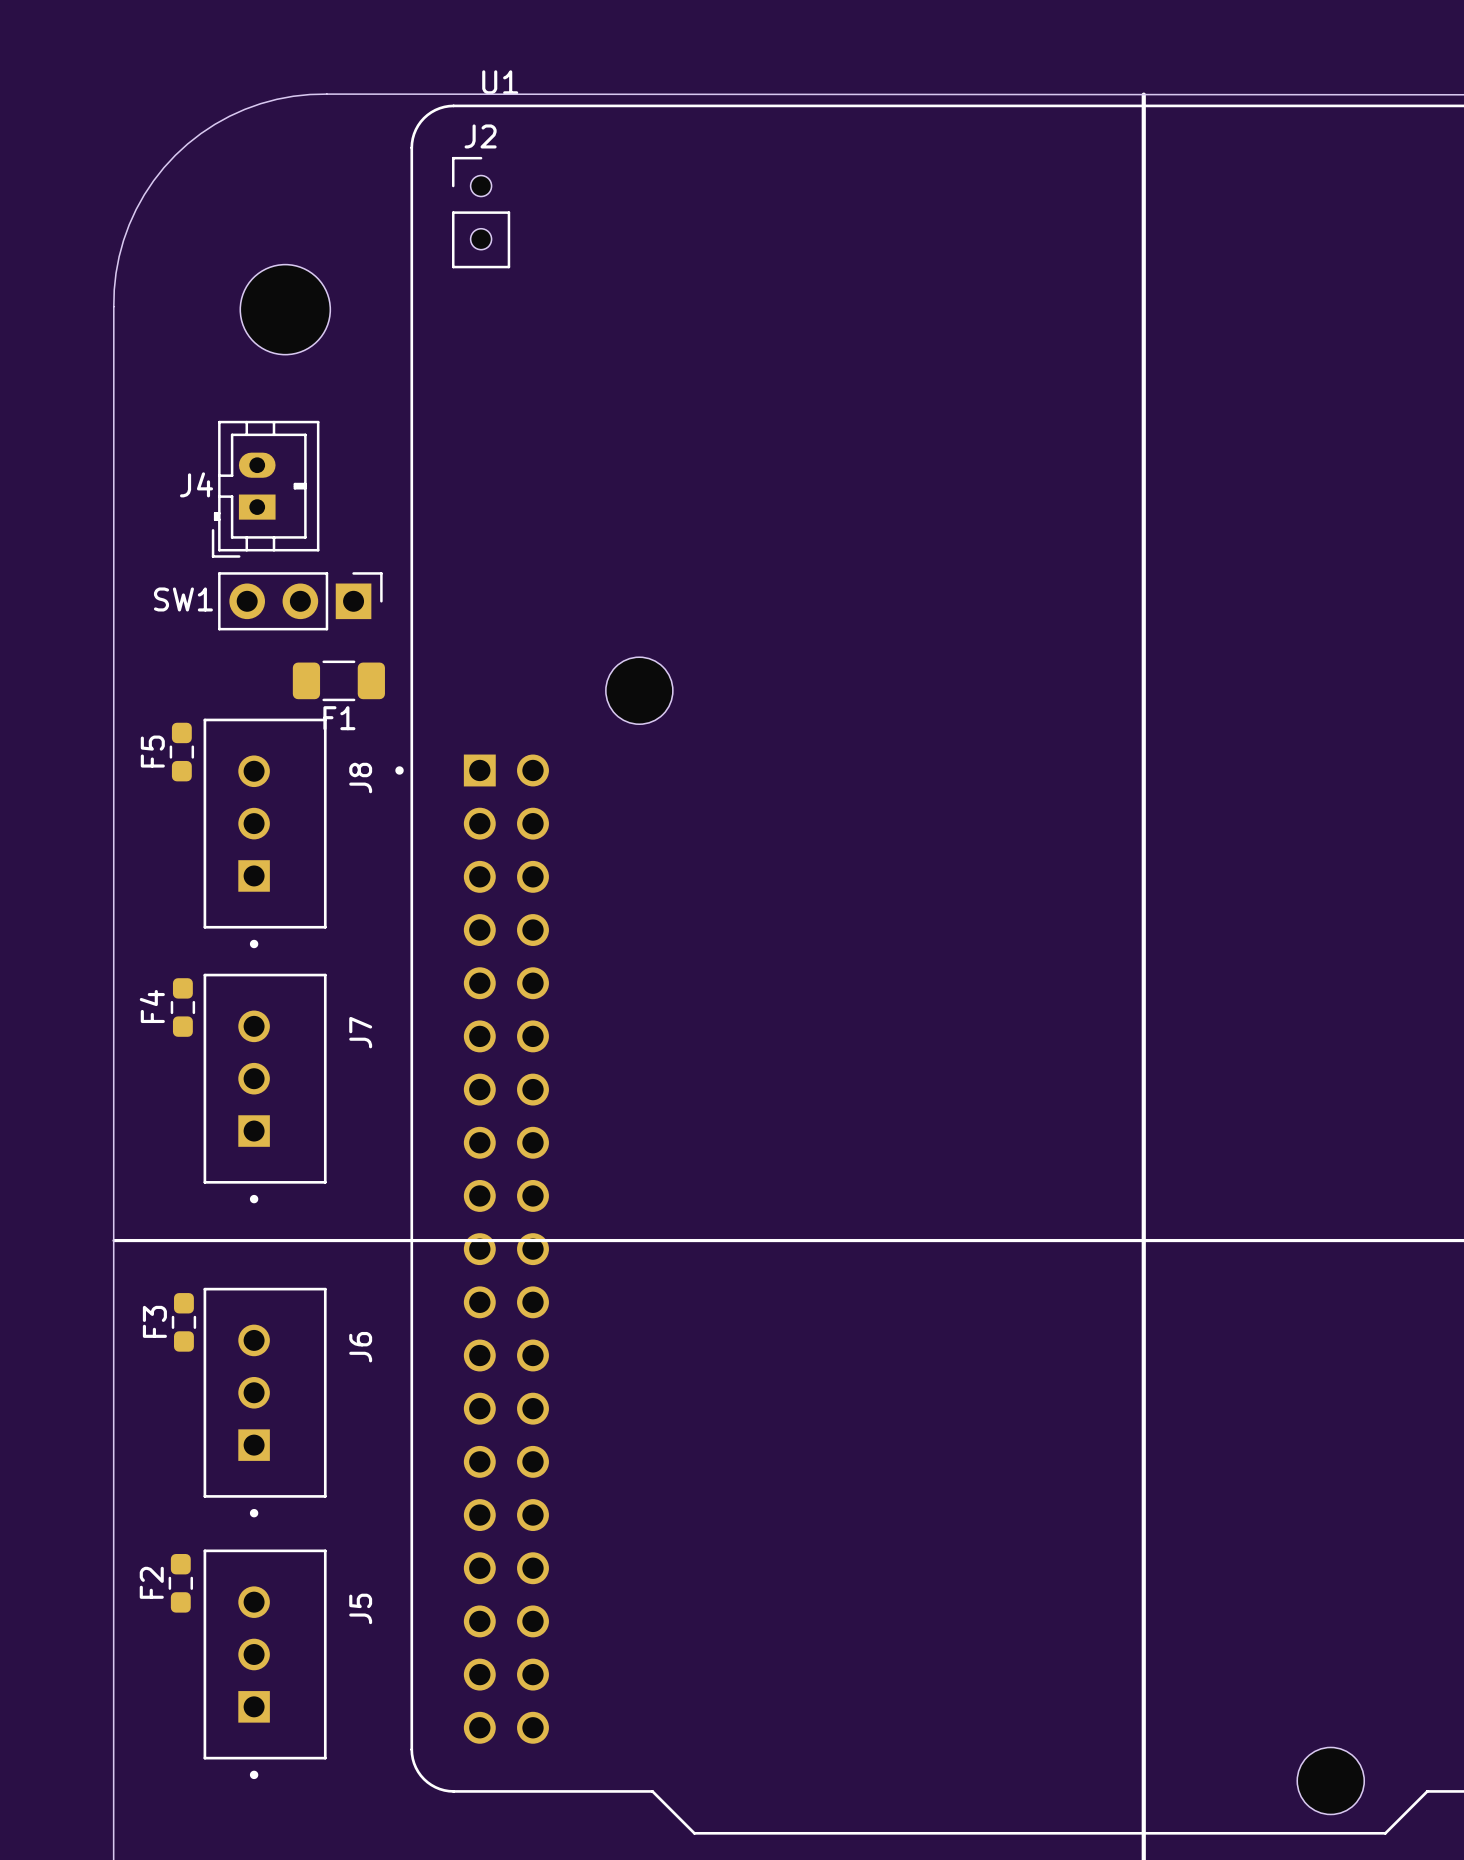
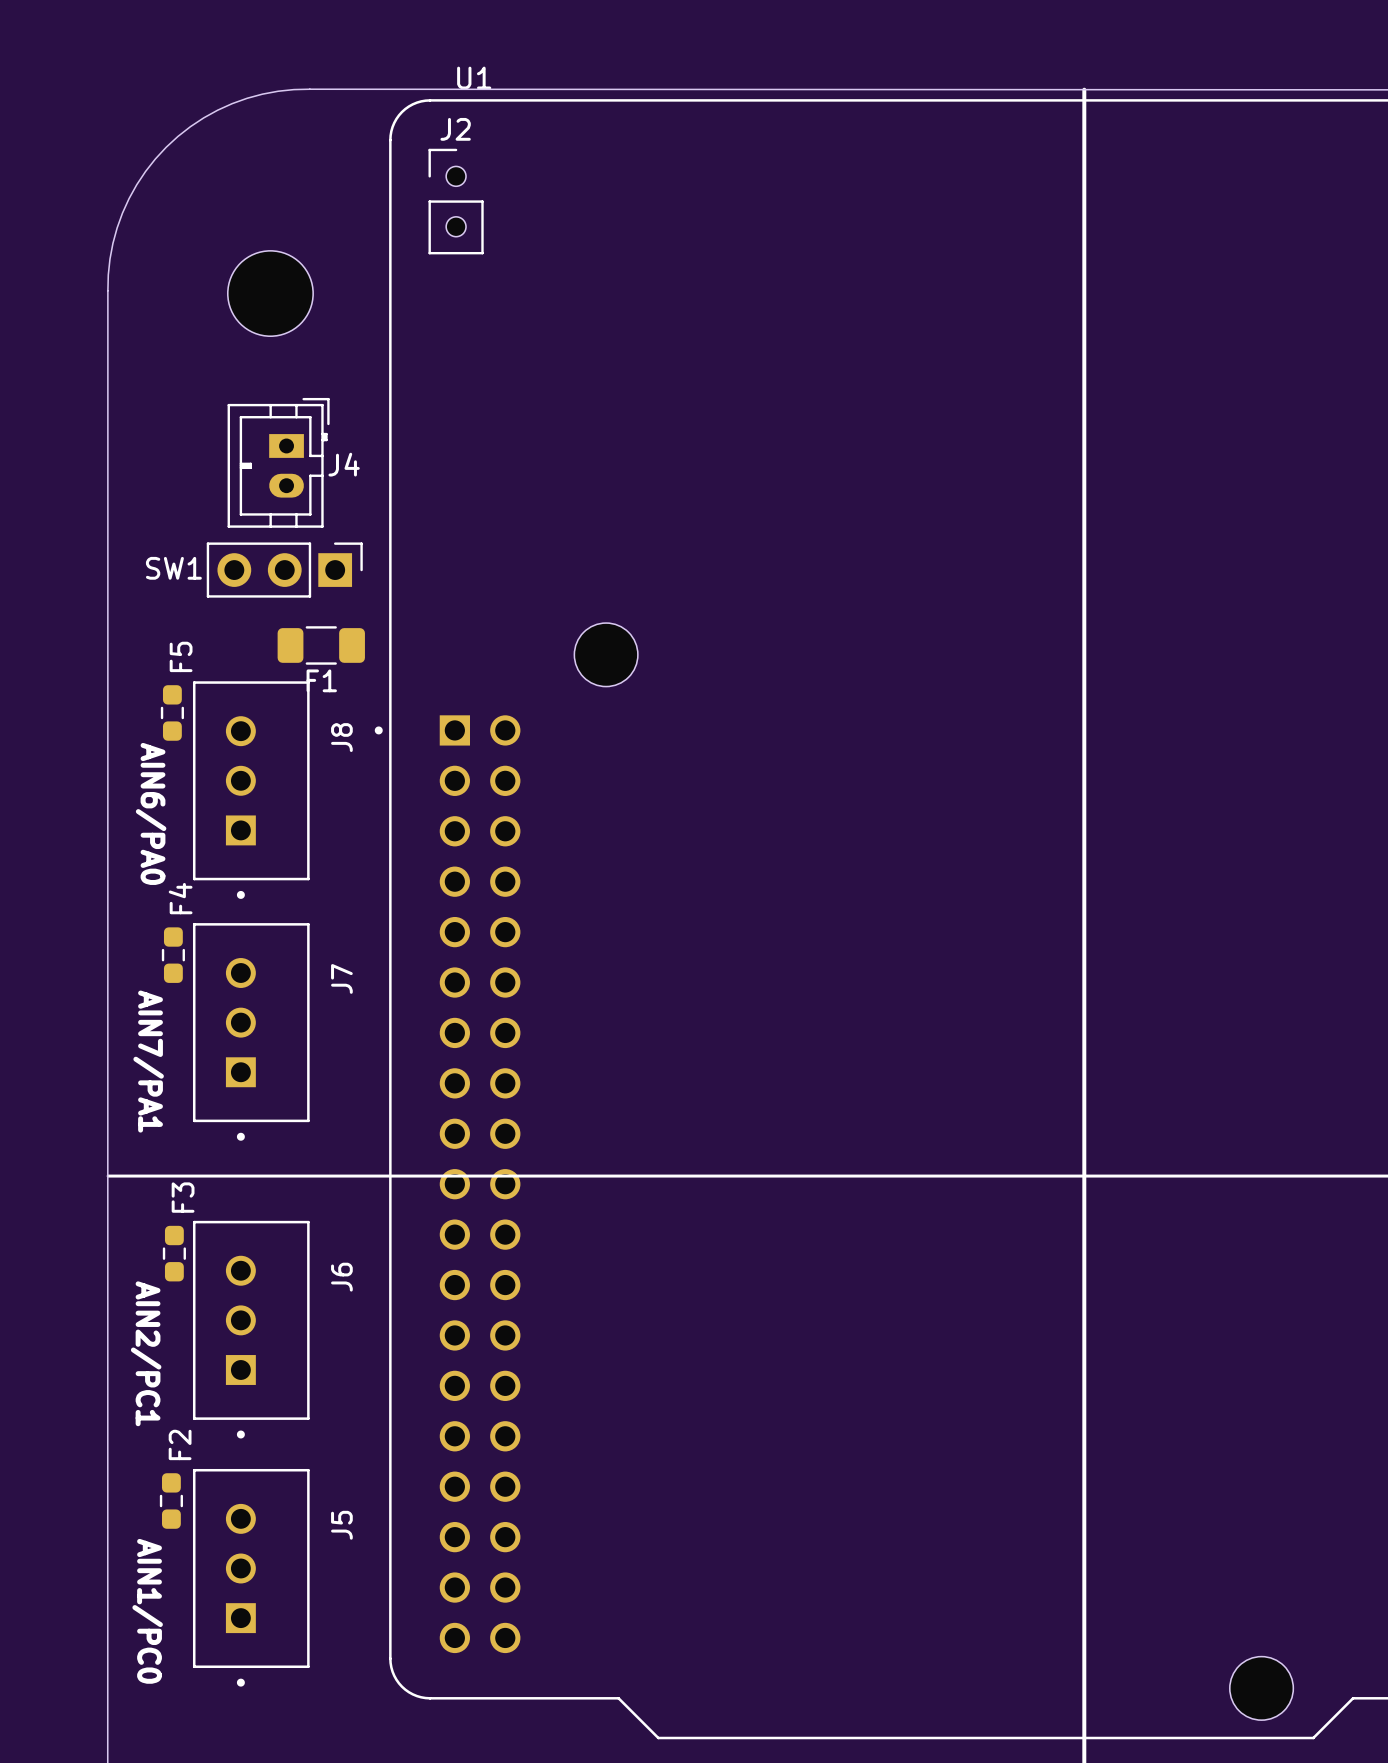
J4 rotation: 0° (265, 489) -> 180° (278, 462)
F5 name position: F5 (152, 751) -> F5 (181, 656)
text: none -> AIN6/PA0 (151, 813)
F4 name position: F4 (152, 1006) -> F4 (180, 898)
text: none -> AIN7/PA1 (148, 1061)
F3 name position: F3 (154, 1321) -> F3 (183, 1197)
text: none -> AIN2/PC1 (146, 1353)
F2 name position: F2 (151, 1582) -> F2 (180, 1444)
text: none -> AIN1/PC0 (147, 1611)

